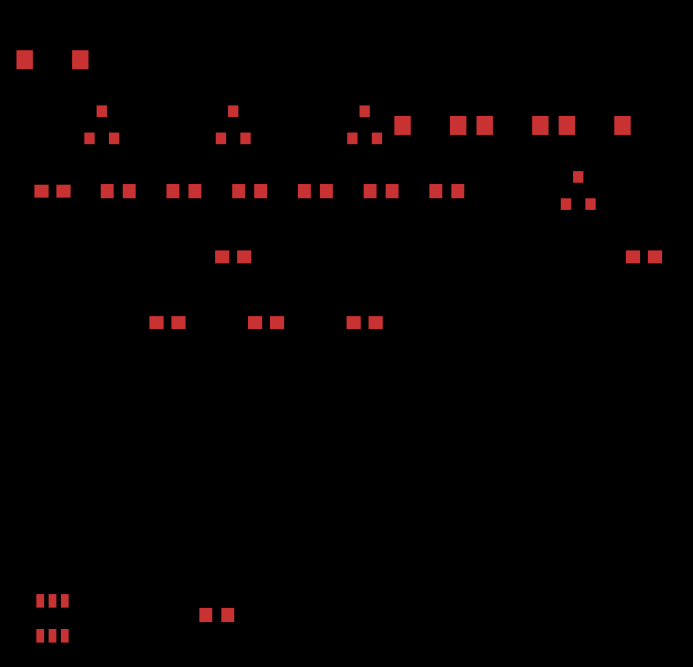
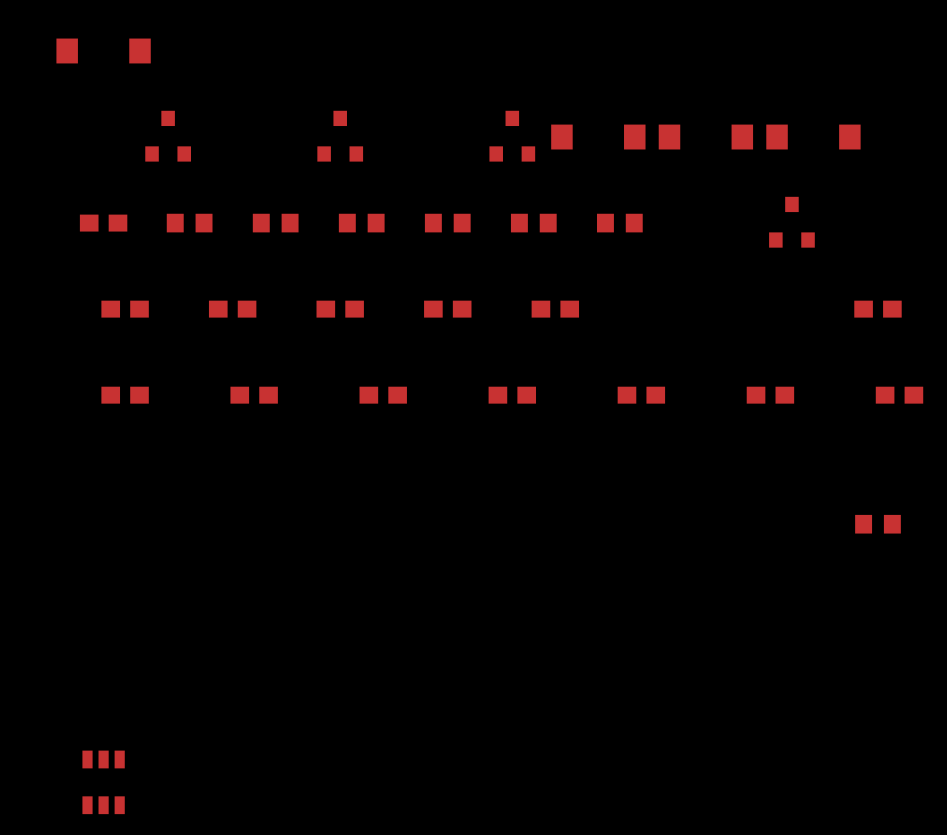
part: none -> (125, 309)
part: none -> (232, 309)
part: none -> (447, 309)
part: none -> (555, 309)
part: none -> (125, 395)
part: none -> (641, 395)
part: none -> (770, 395)
part: none -> (899, 395)
part: none -> (877, 524)
part: (216, 615) -> none

